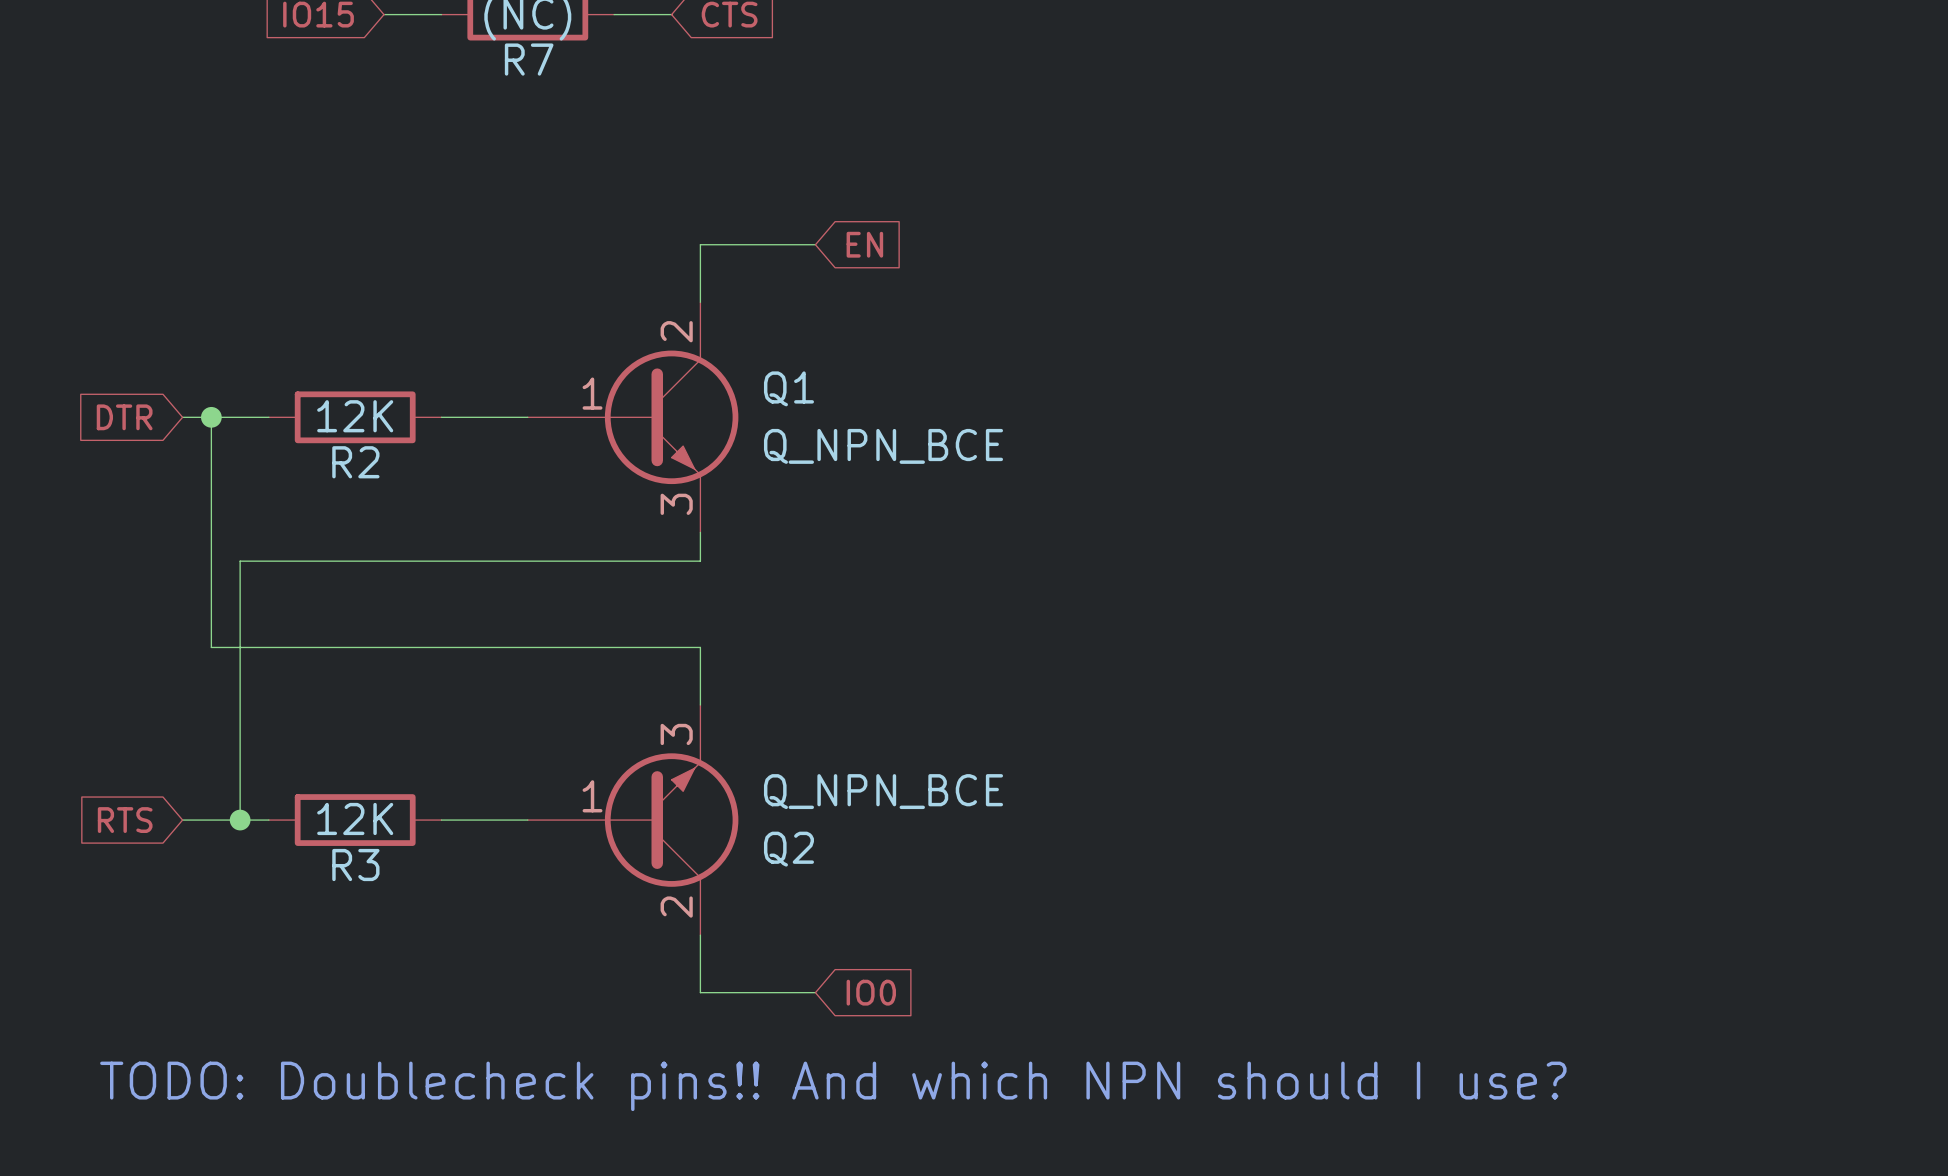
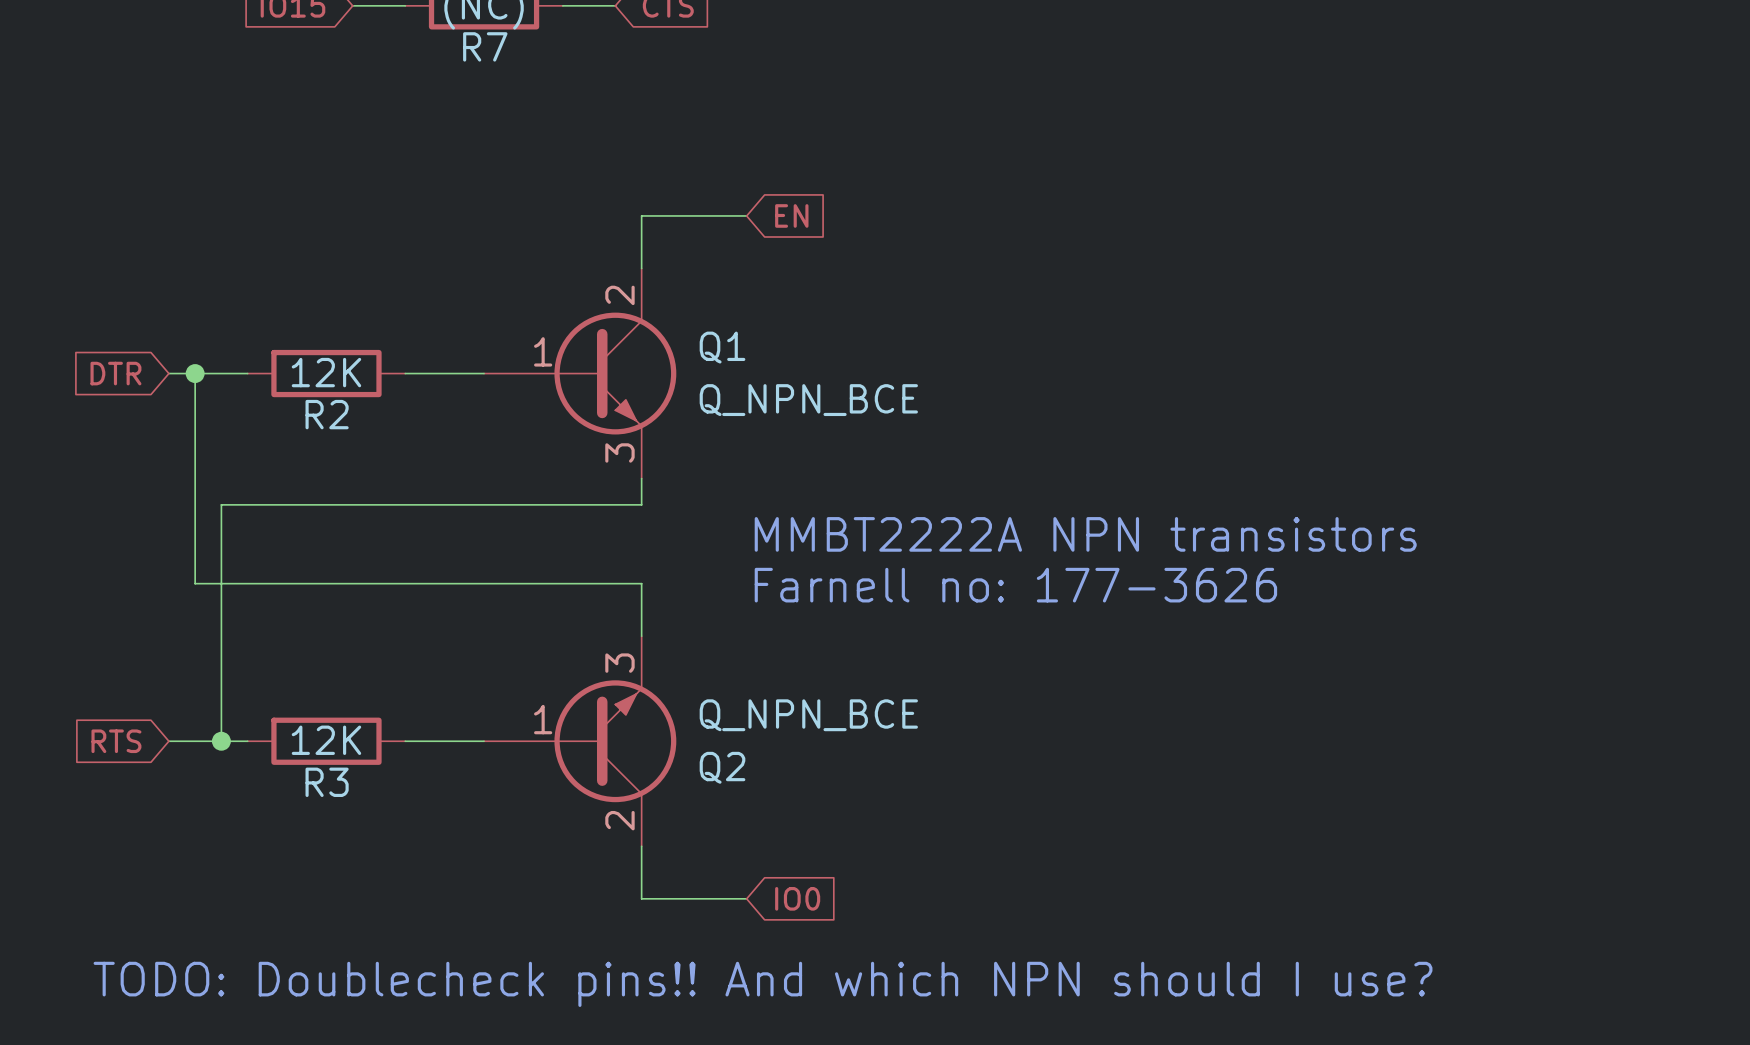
text: none -> MMBT2222A NPN transistors (1085, 534)
text: none -> Farnell no: 177-3626 (1015, 585)

